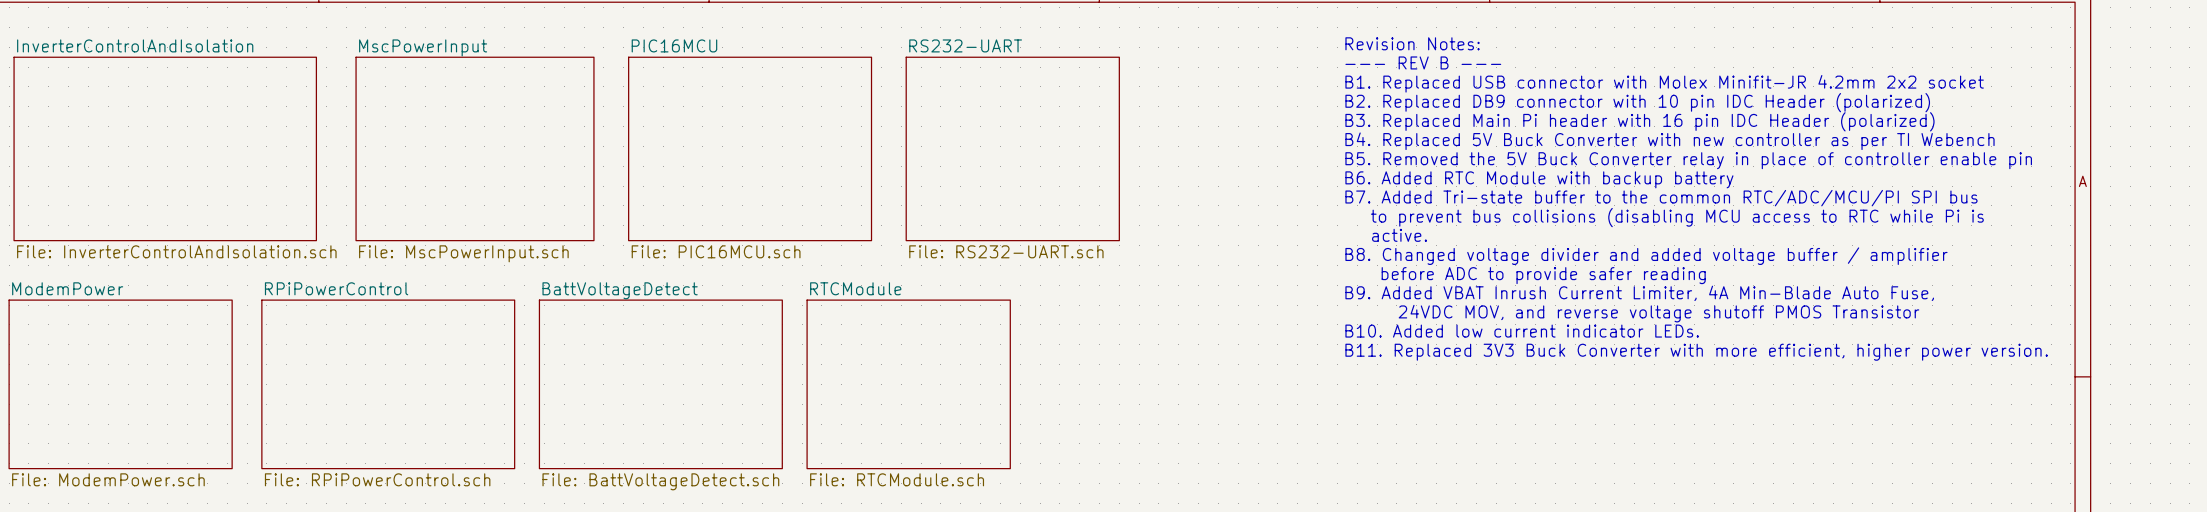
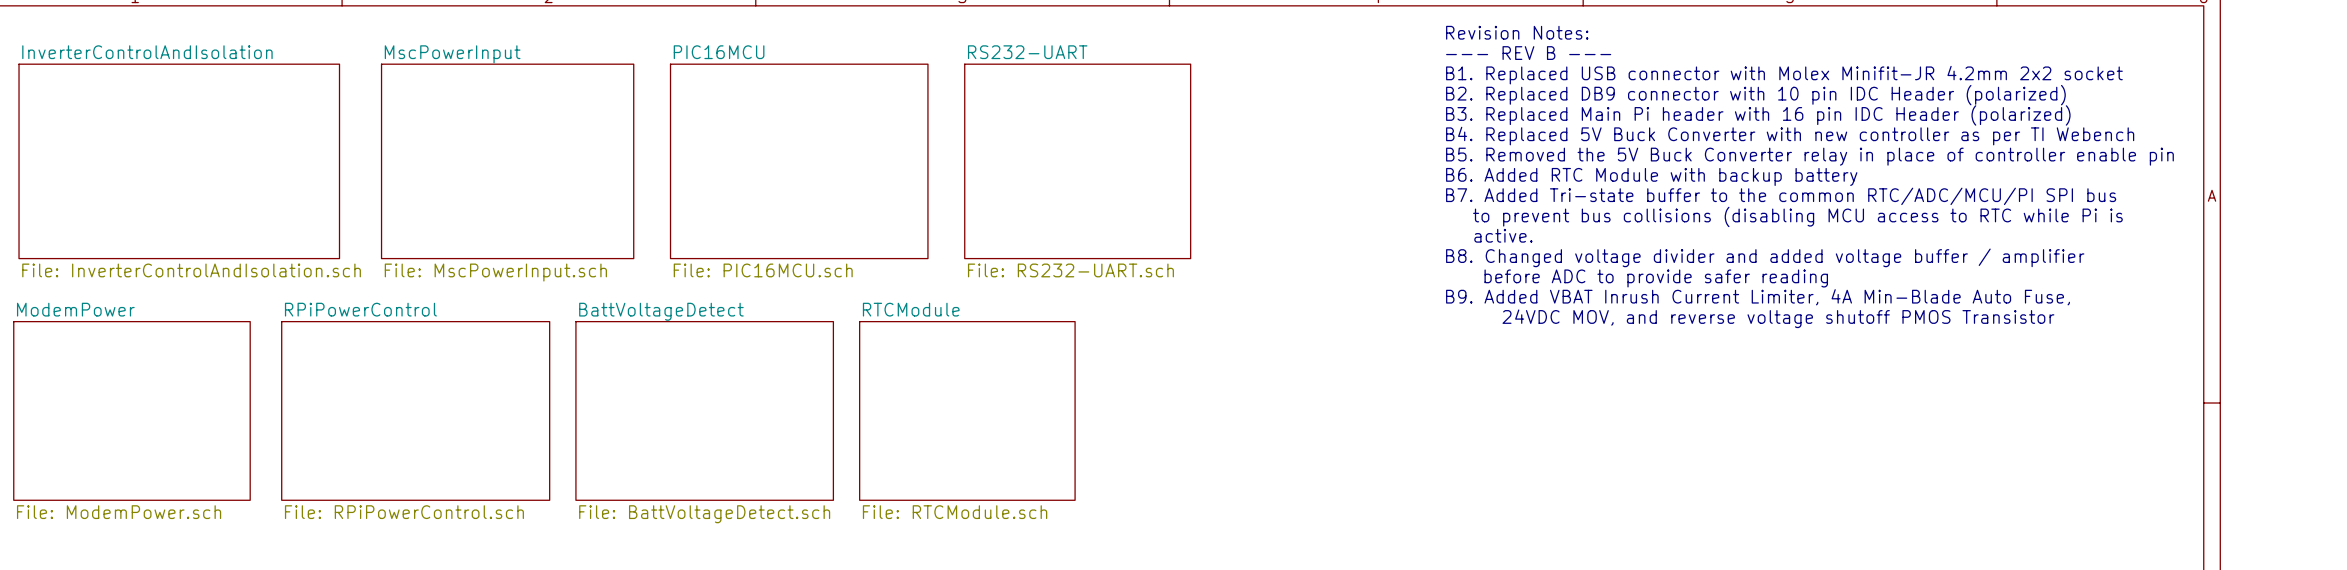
text position: Revision Notes: (1412, 43) -> Revision Notes: (1517, 32)
text position: --- REV B --- (1423, 62) -> --- REV B --- (1528, 53)
text position: B1. Replaced USB connector with Molex Minifit-JR 4.2mm 2x2 socket (1664, 83) -> B1. Replaced USB connector with Molex Minifit-JR 4.2mm 2x2 socket (1784, 75)
text position: B2. Replaced DB9 connector with 10 pin IDC Header (polarized) (1637, 102) -> B2. Replaced DB9 connector with 10 pin IDC Header (polarized) (1755, 95)
text position: B3. Replaced Main Pi header with 16 pin IDC Header (polarized) (1639, 121) -> B3. Replaced Main Pi header with 16 pin IDC Header (polarized) (1758, 115)
text position: B4. Replaced 5V Buck Converter with new controller as per TI Webench (1669, 141) -> B4. Replaced 5V Buck Converter with new controller as per TI Webench (1790, 136)
text position: B5. Removed the 5V Buck Converter relay in place of controller enable pin (1688, 160) -> B5. Removed the 5V Buck Converter relay in place of controller enable pin (1809, 156)
text position: B6. Added RTC Module with backup battery (1539, 179) -> B6. Added RTC Module with backup battery (1651, 176)
text position: B7. Added Tri-state buffer to the common RTC/ADC/MCU/PI SPI bus (1661, 198) -> B7. Added Tri-state buffer to the common RTC/ADC/MCU/PI SPI bus (1781, 196)
text position: to prevent bus collisions (disabling MCU access to RTC while Pi is (1677, 217) -> to prevent bus collisions (disabling MCU access to RTC while Pi is (1797, 216)
text position: active. (1399, 235) -> active. (1503, 235)
text position: B8. Changed voltage divider and added voltage buffer / amplifier (1646, 256) -> B8. Changed voltage divider and added voltage buffer / amplifier (1765, 257)
text position: before ADC to provide safer reading (1543, 275) -> before ADC to provide safer reading (1656, 278)
text position: B9. Added VBAT Inrush Current Limiter, 4A Min-Blade Auto Fuse, (1639, 293) -> B9. Added VBAT Inrush Current Limiter, 4A Min-Blade Auto Fuse, (1758, 297)
text position: 24VDC MOV, and reverse voltage shutoff PMOS Transistor (1658, 313) -> 24VDC MOV, and reverse voltage shutoff PMOS Transistor (1778, 318)
text: B10. Added low current indicator LEDs. (1522, 331) -> none
text: B11. Replaced 3V3 Buck Converter with more efficient, higher power version. (1696, 352) -> none

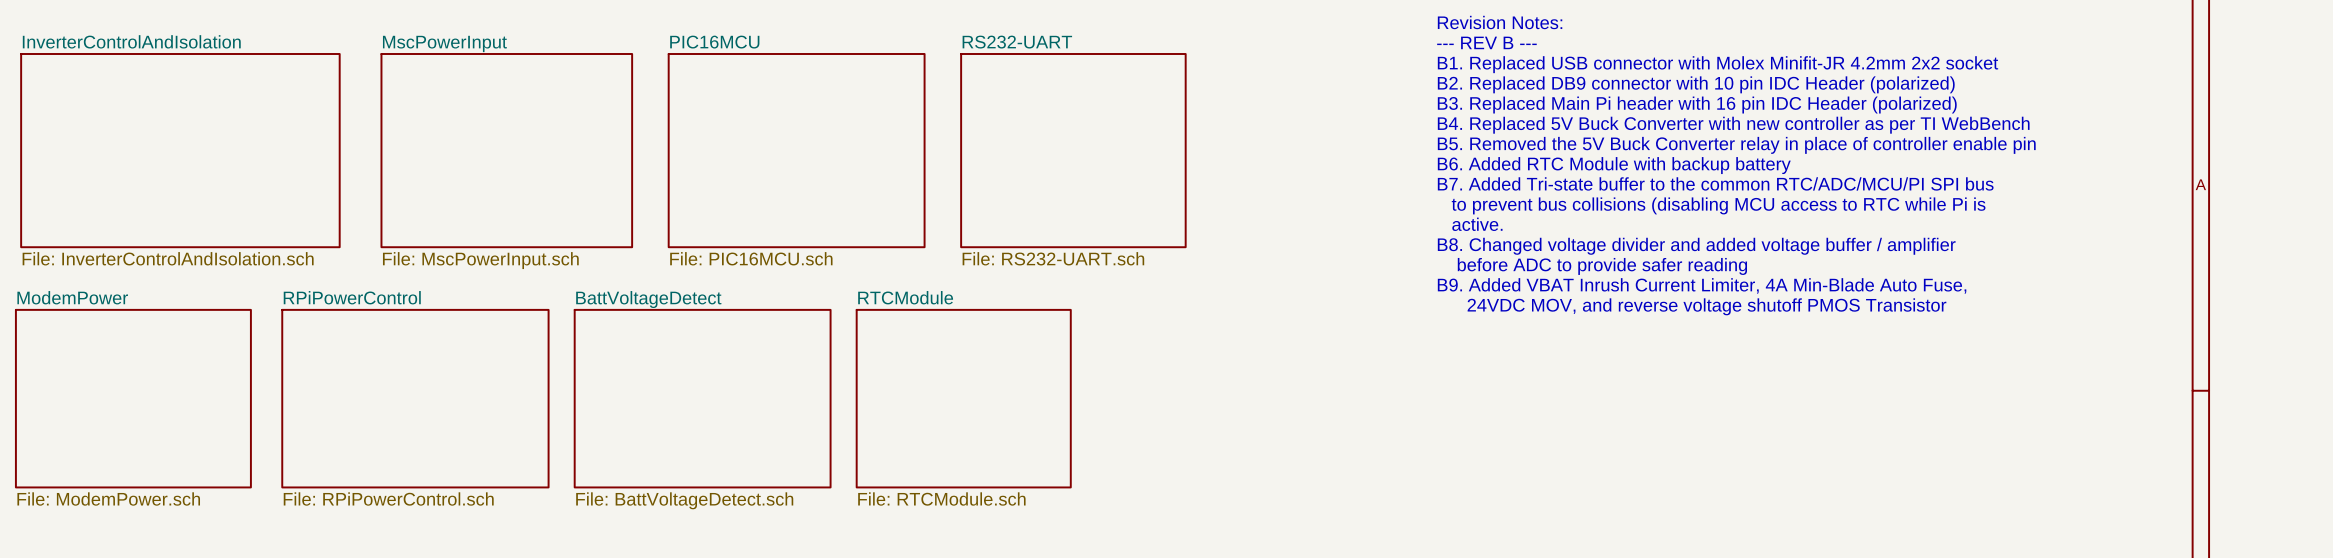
text: B4. Replaced 5V Buck Converter with new controller as per TI Webench (1790, 136) -> B4. Replaced 5V Buck Converter with new controller as per TI WebBench (1733, 125)

